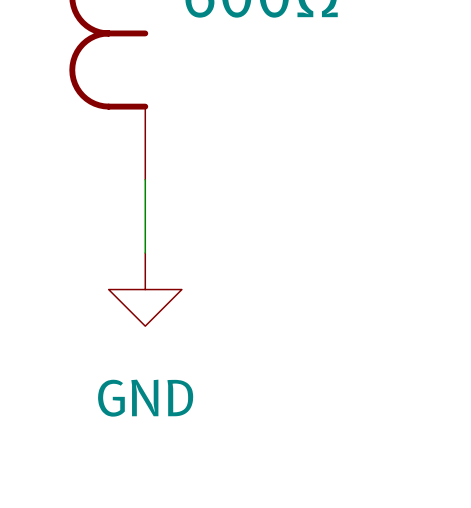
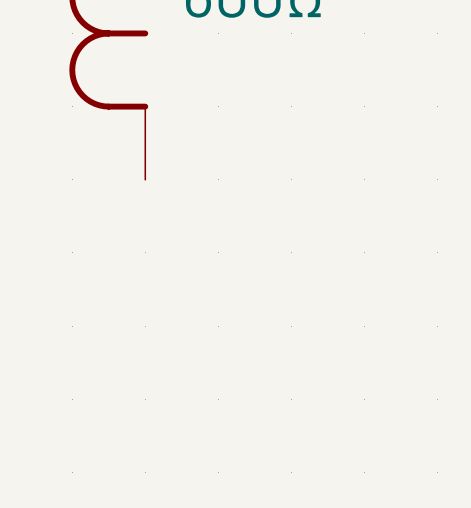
wire: (145, 179) (145, 252) -> none
power symbol: GND (145, 289) -> none

